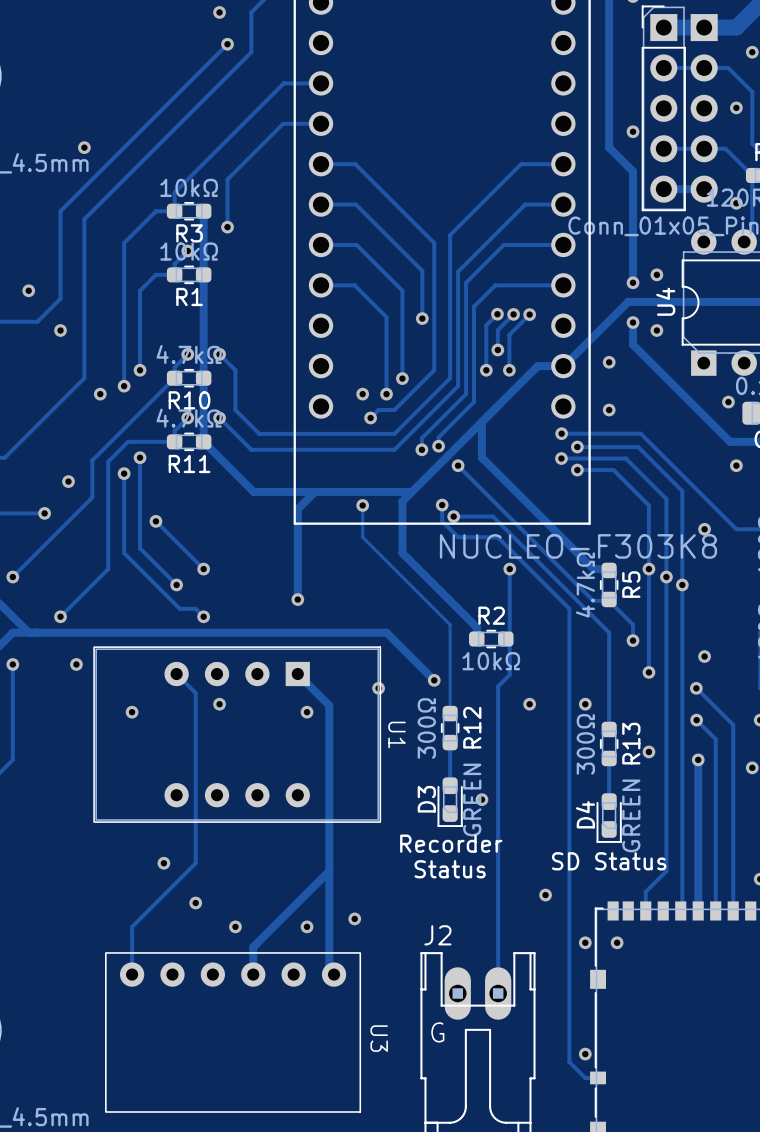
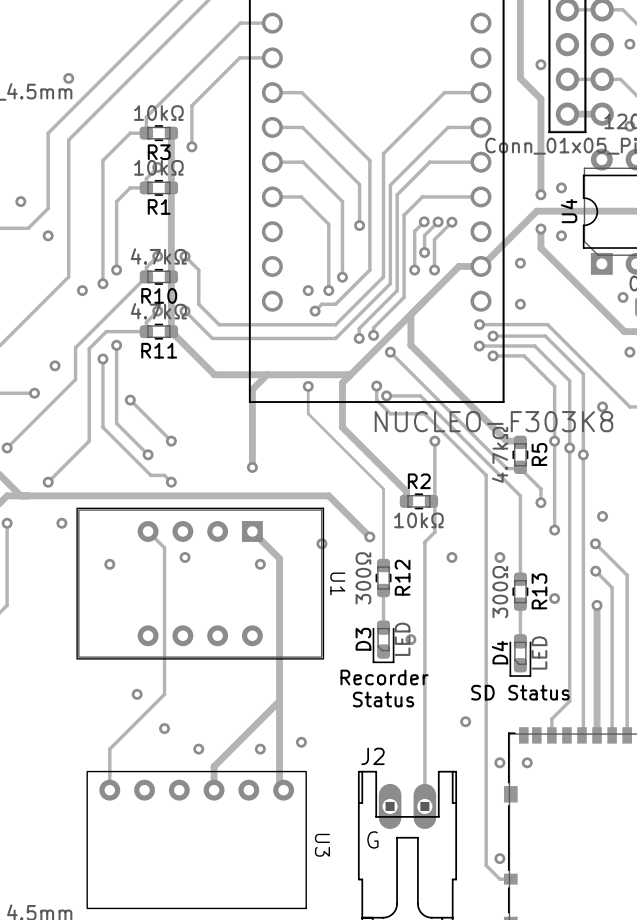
D3 value: GREEN (472, 800) -> LED (402, 639)
D4 value: GREEN (631, 815) -> LED (539, 652)

